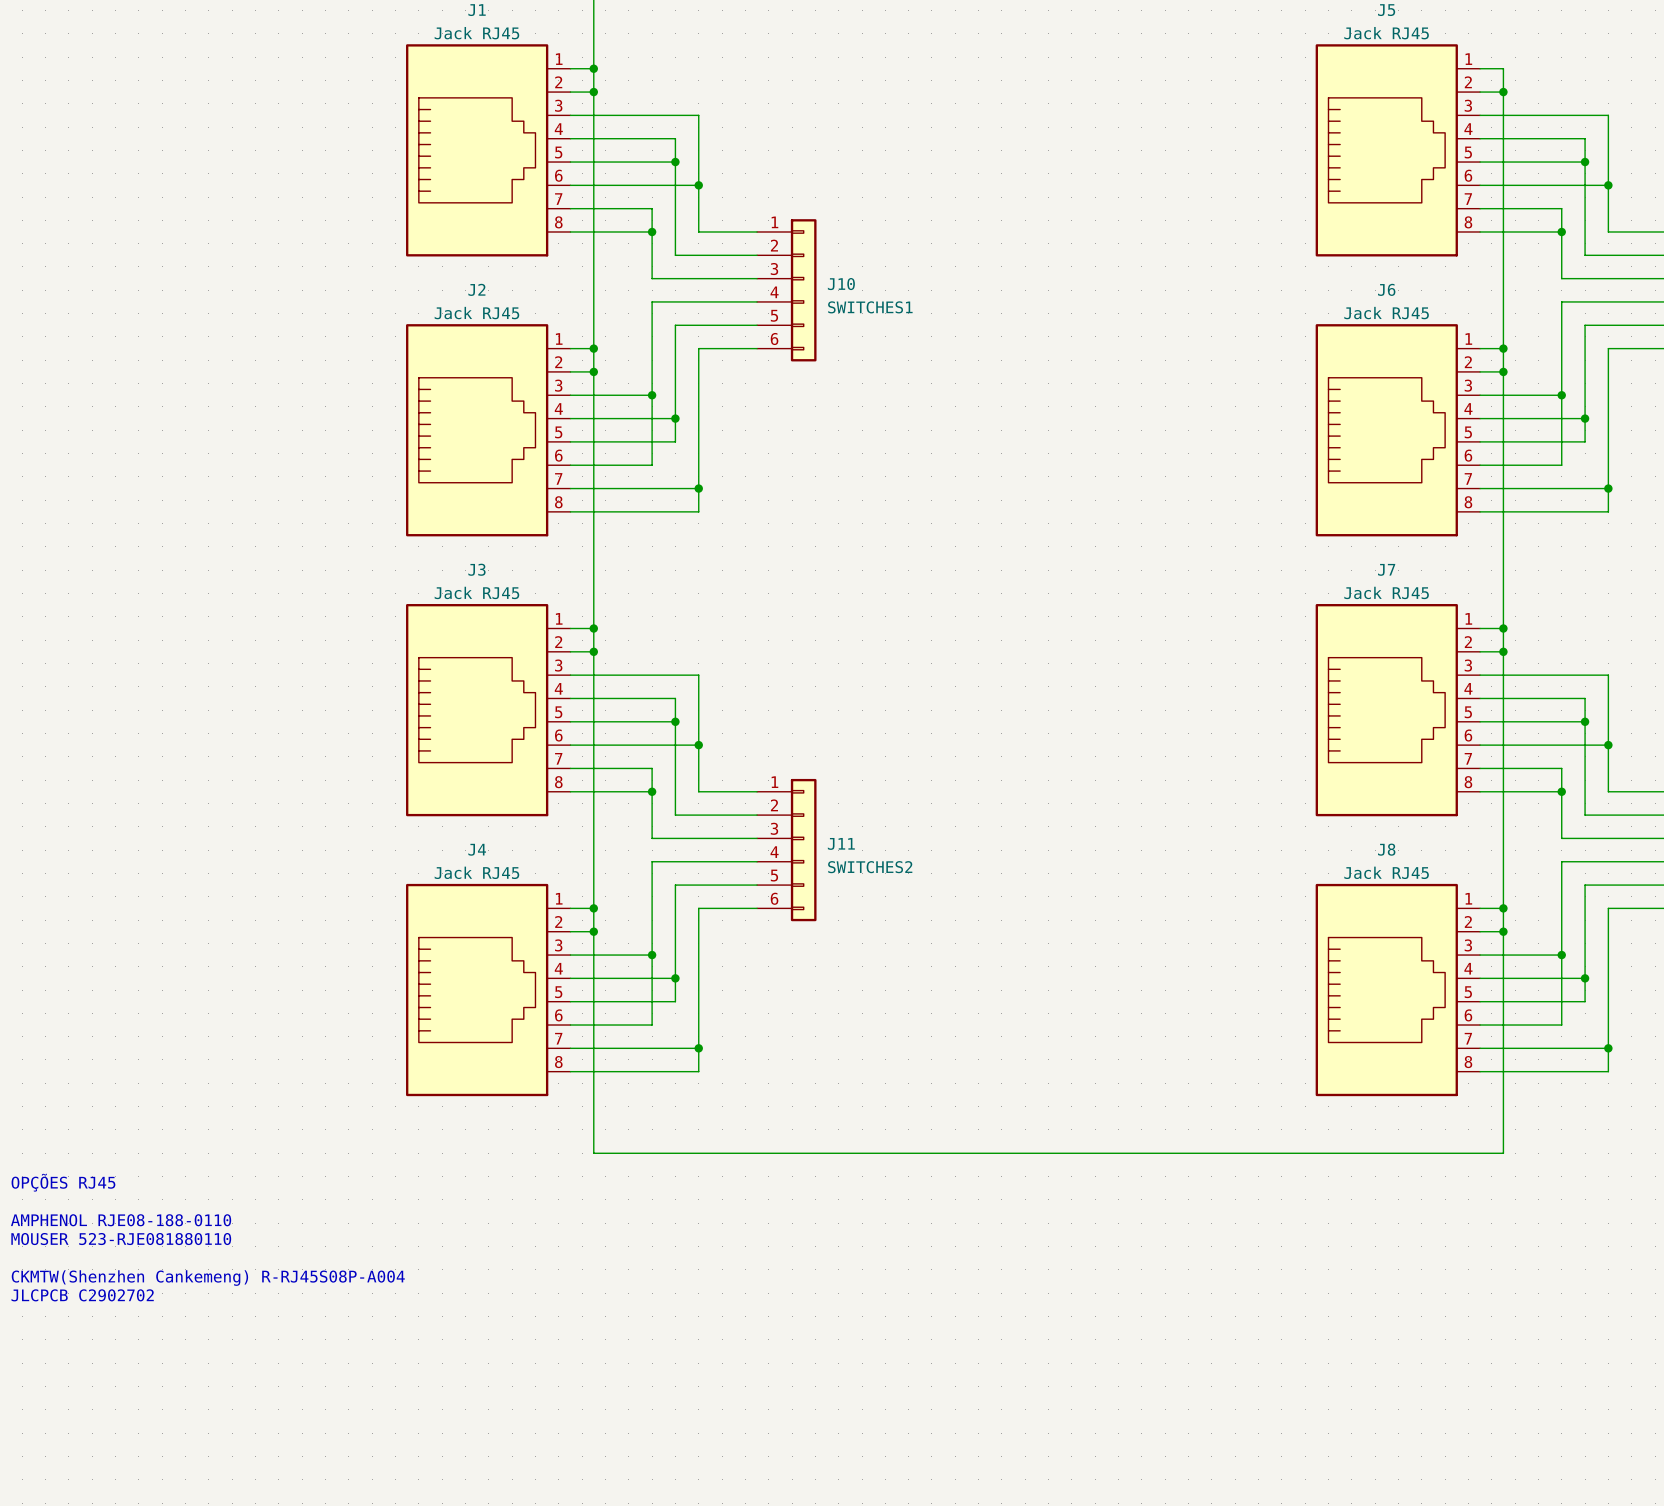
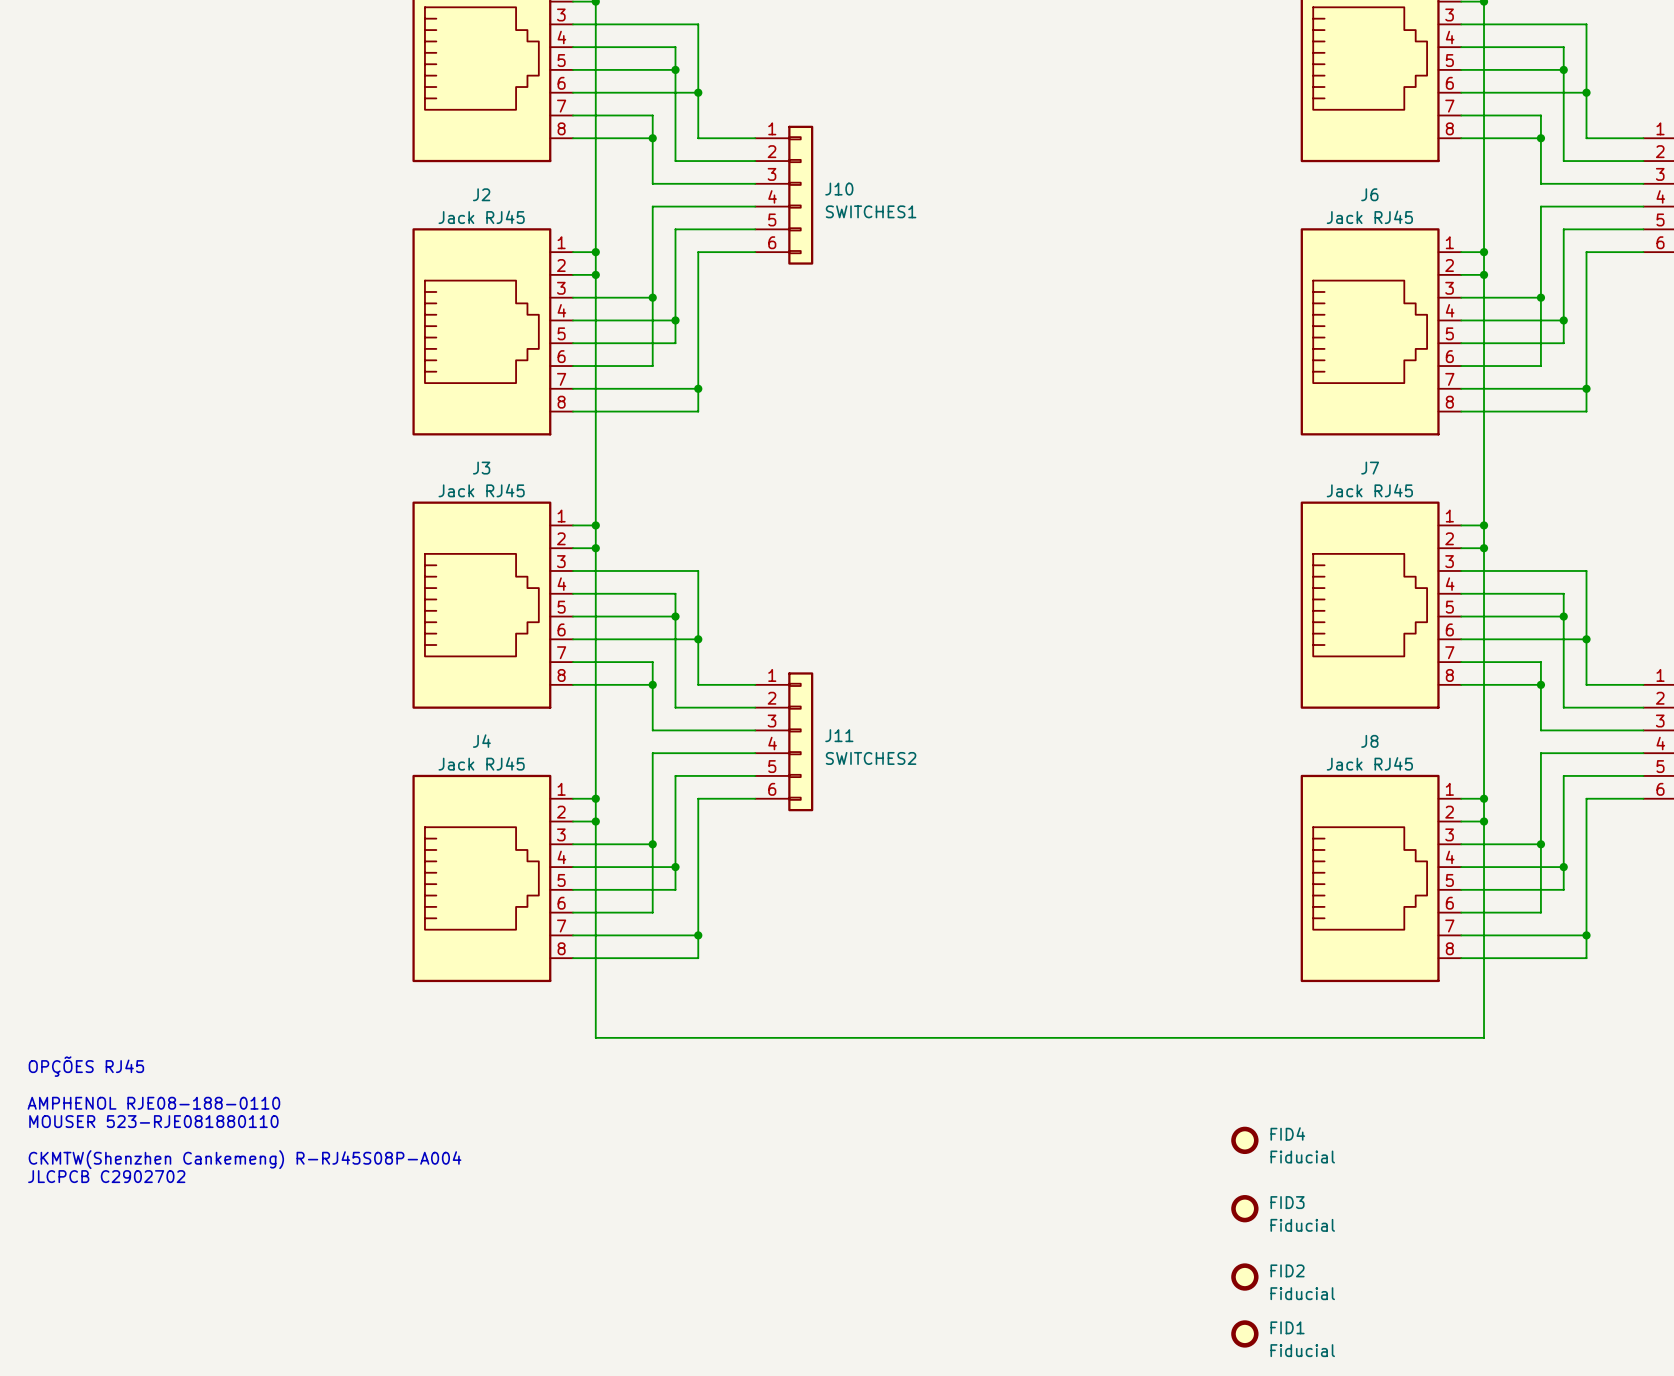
FID4: none -> Fiducial (1244, 1140)
FID3: none -> Fiducial (1244, 1208)
FID2: none -> Fiducial (1244, 1277)
FID1: none -> Fiducial (1244, 1333)

